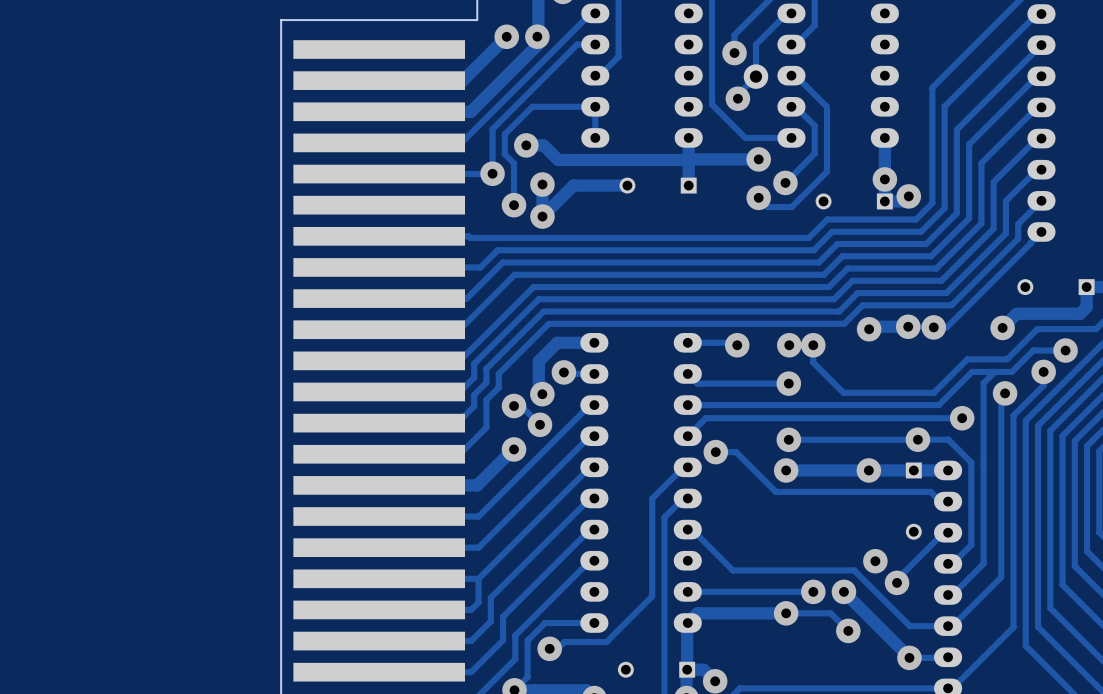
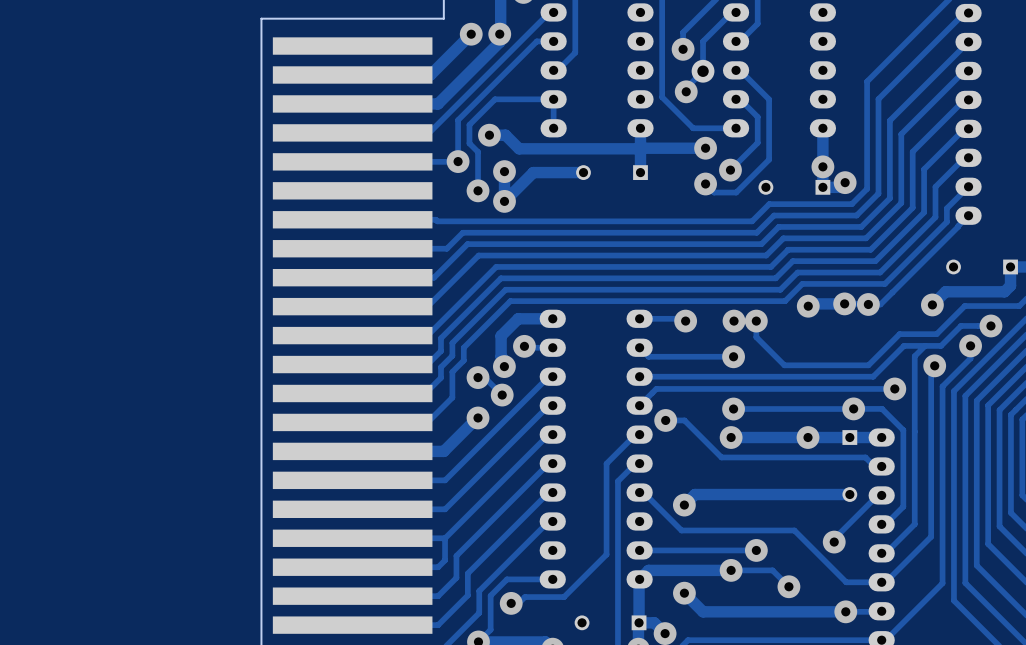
track: none -> (849, 494) (694, 494) (684, 505)
via: none -> (684, 505)
via: (875, 561) -> none
track: (843, 591) (909, 657) -> (684, 593) (703, 611) (845, 611)
via: (843, 591) -> none
via: none -> (684, 593)

